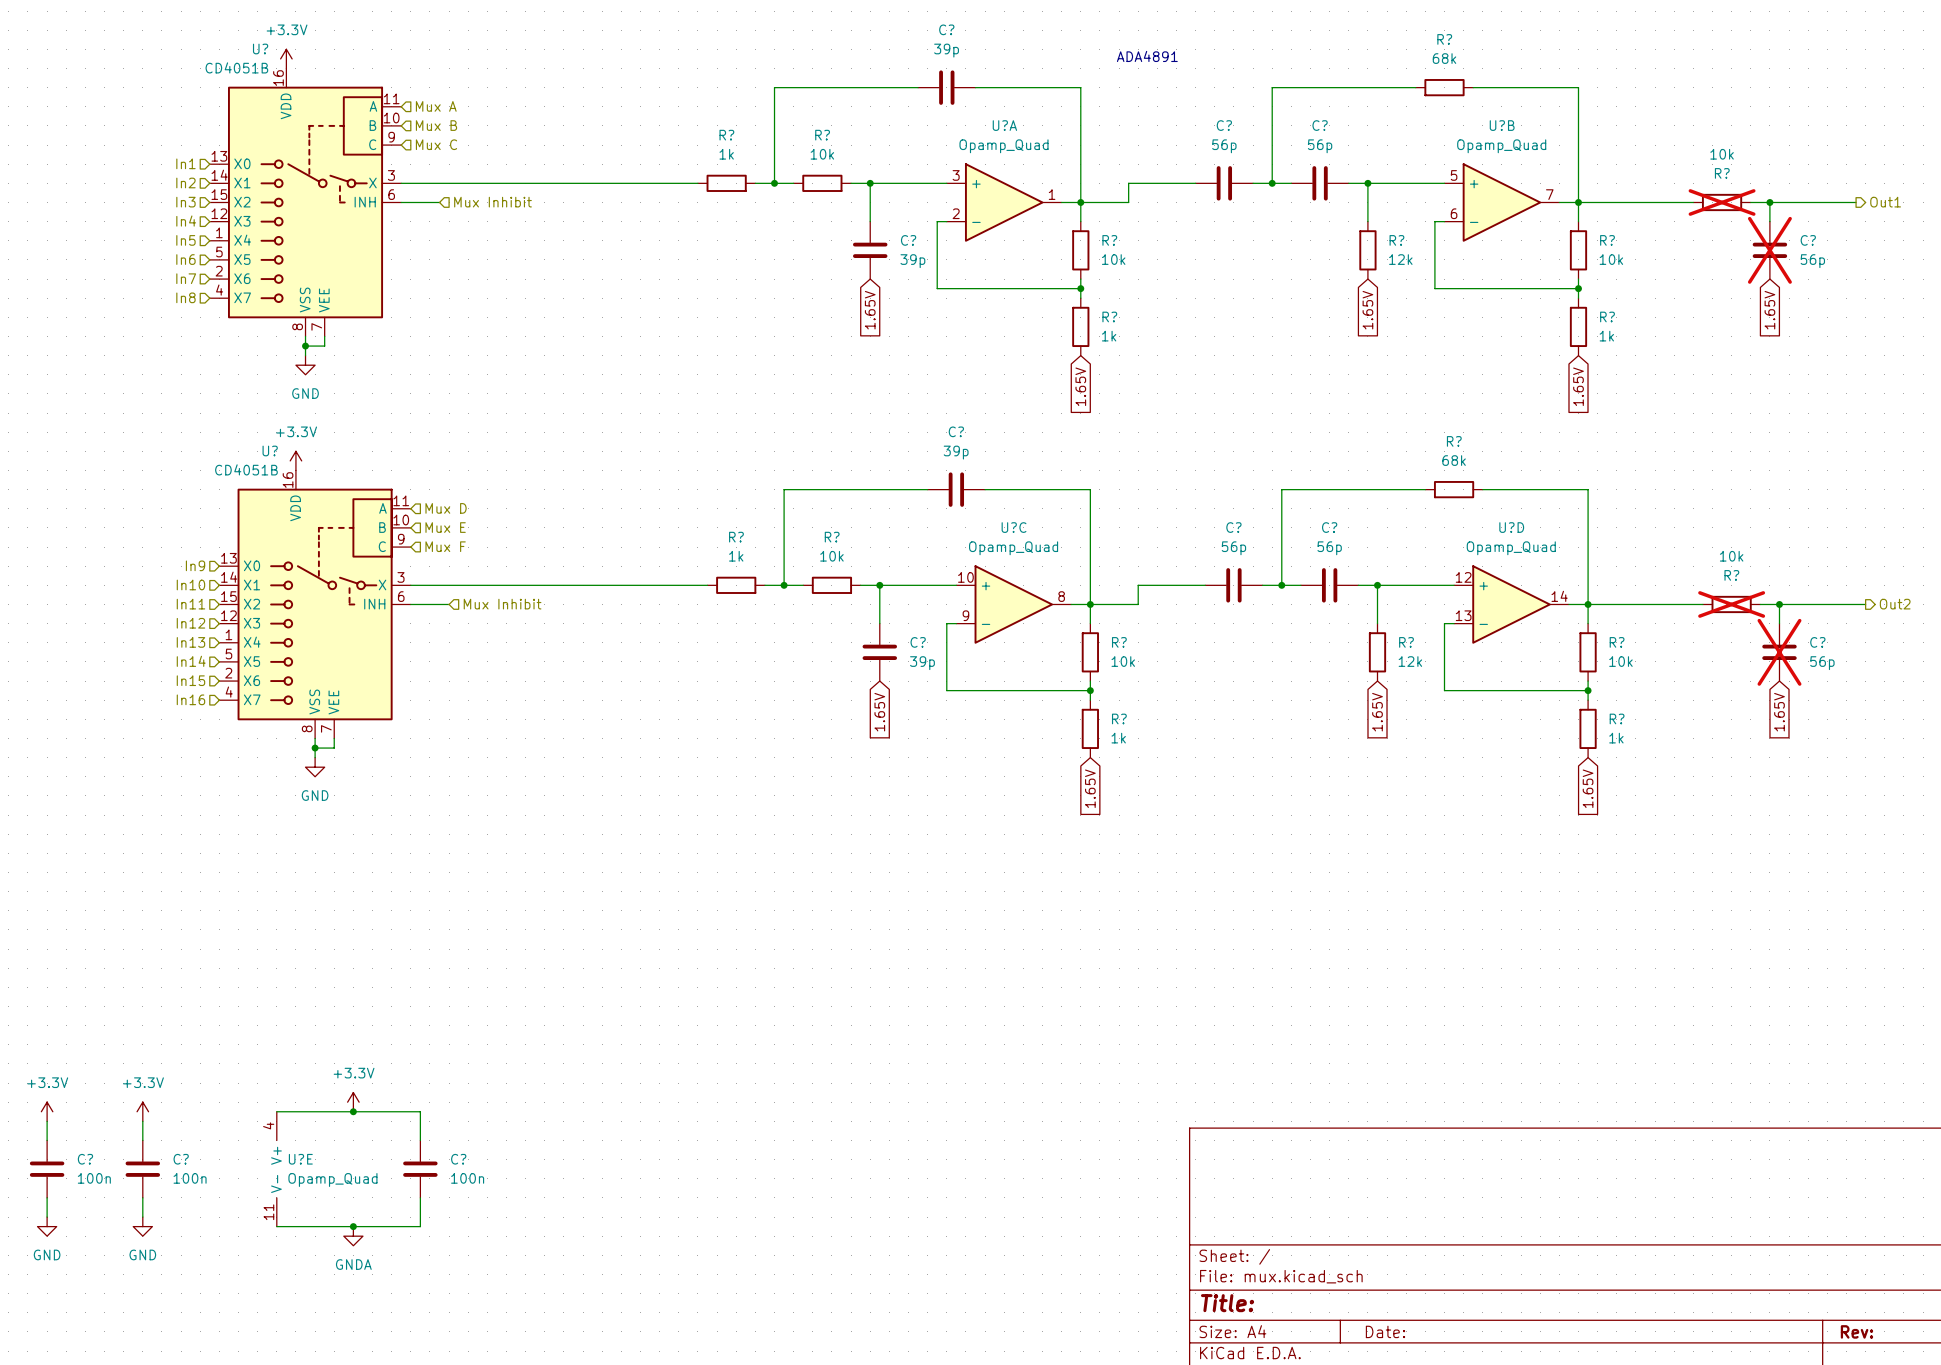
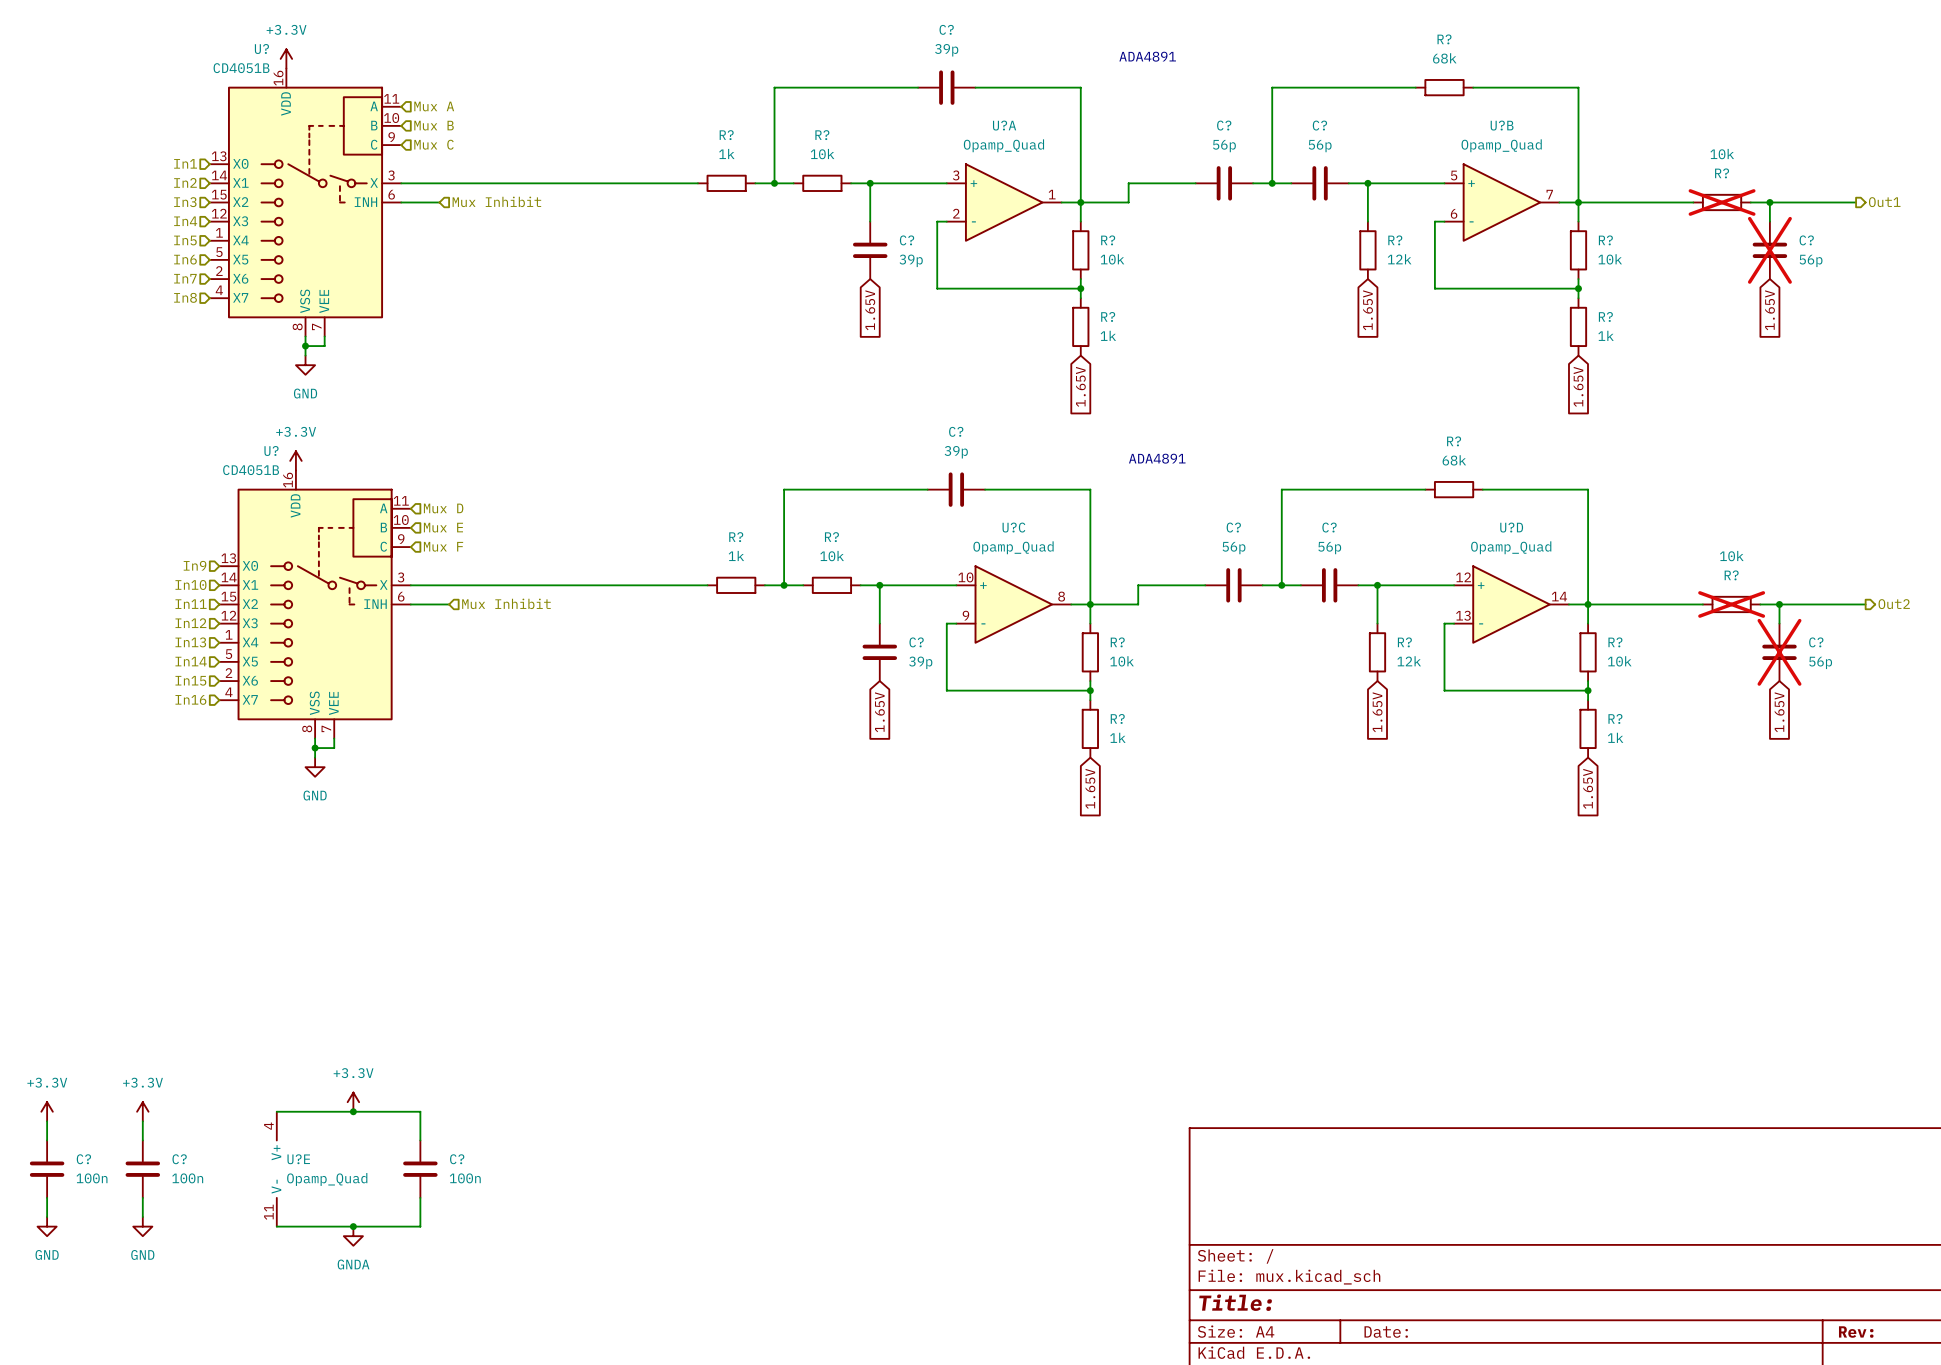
text: none -> ADA4891 (1157, 458)

